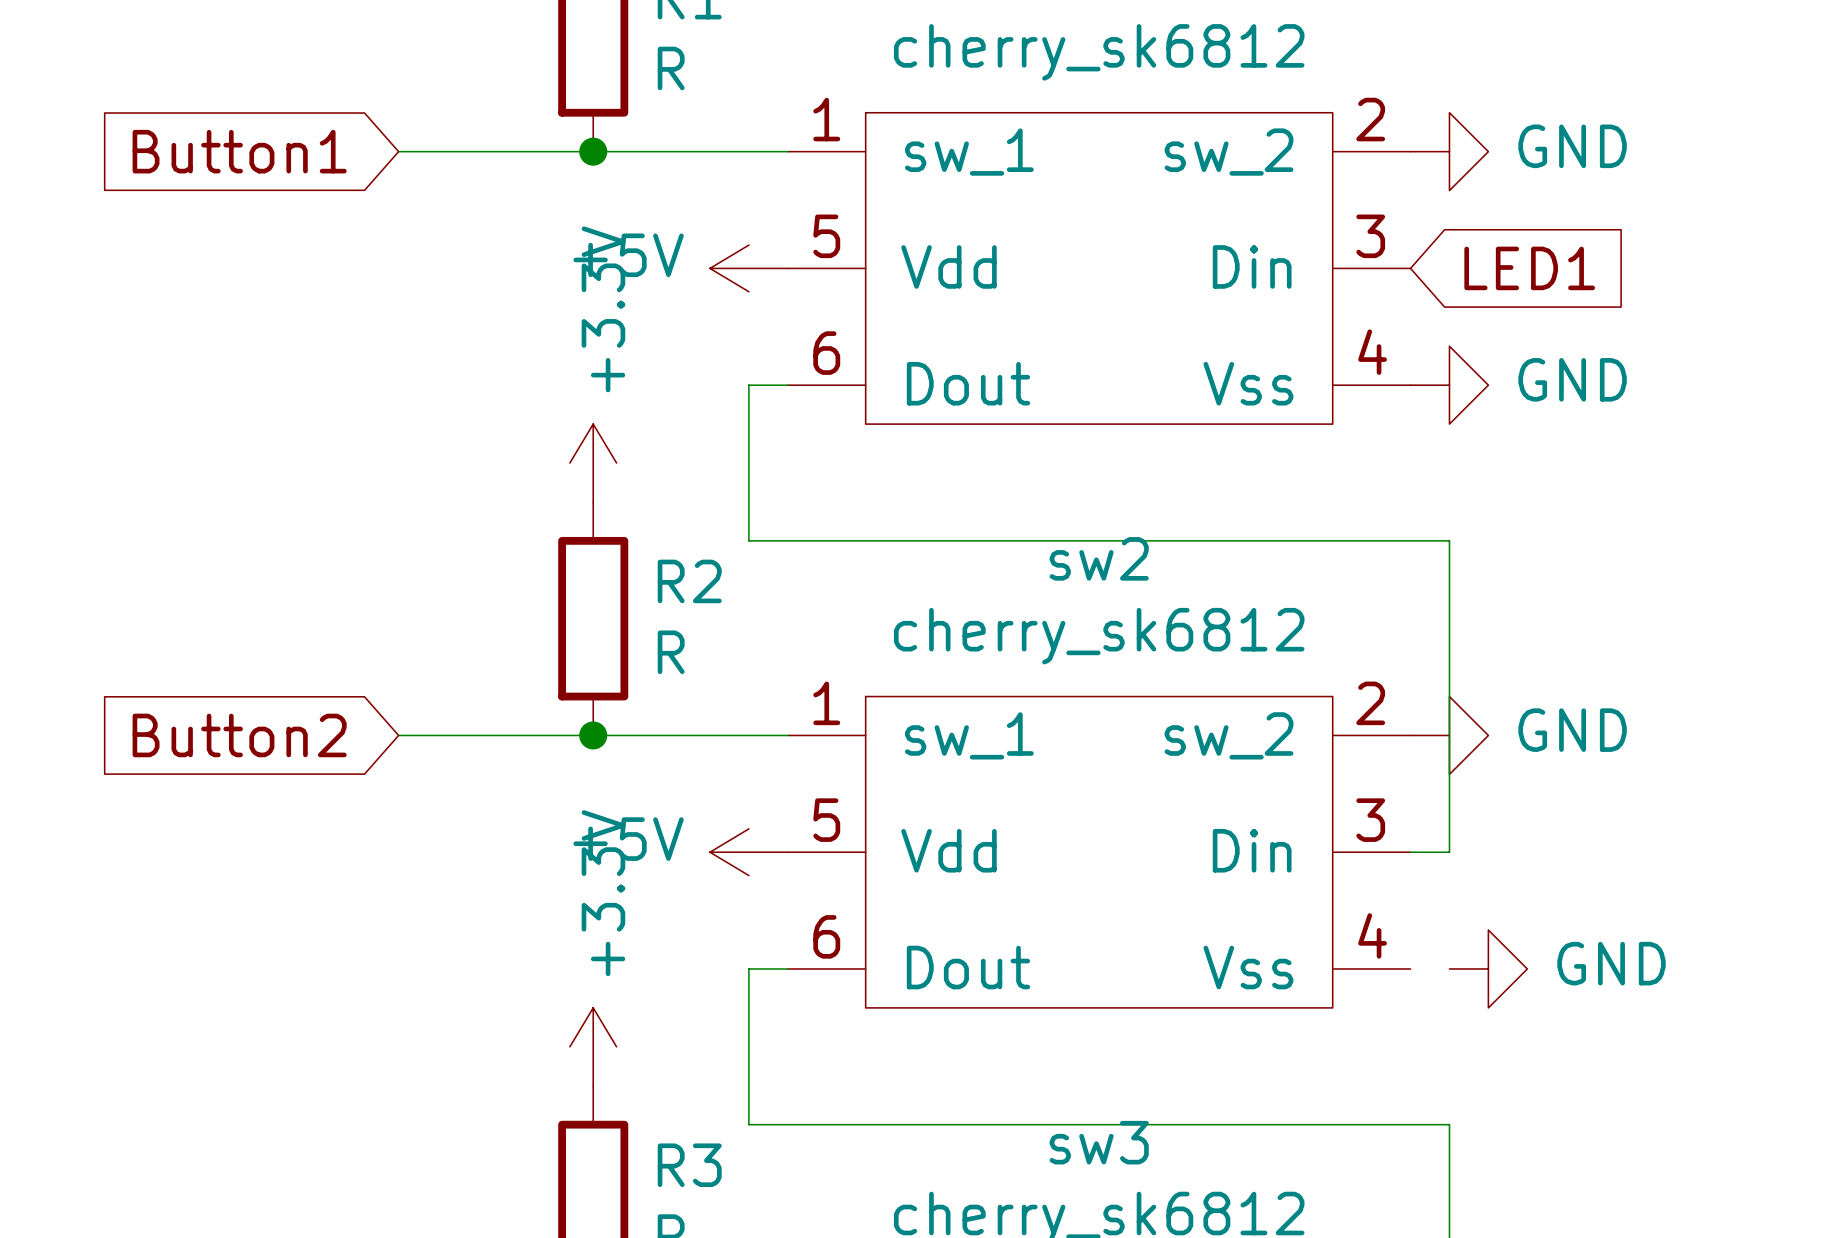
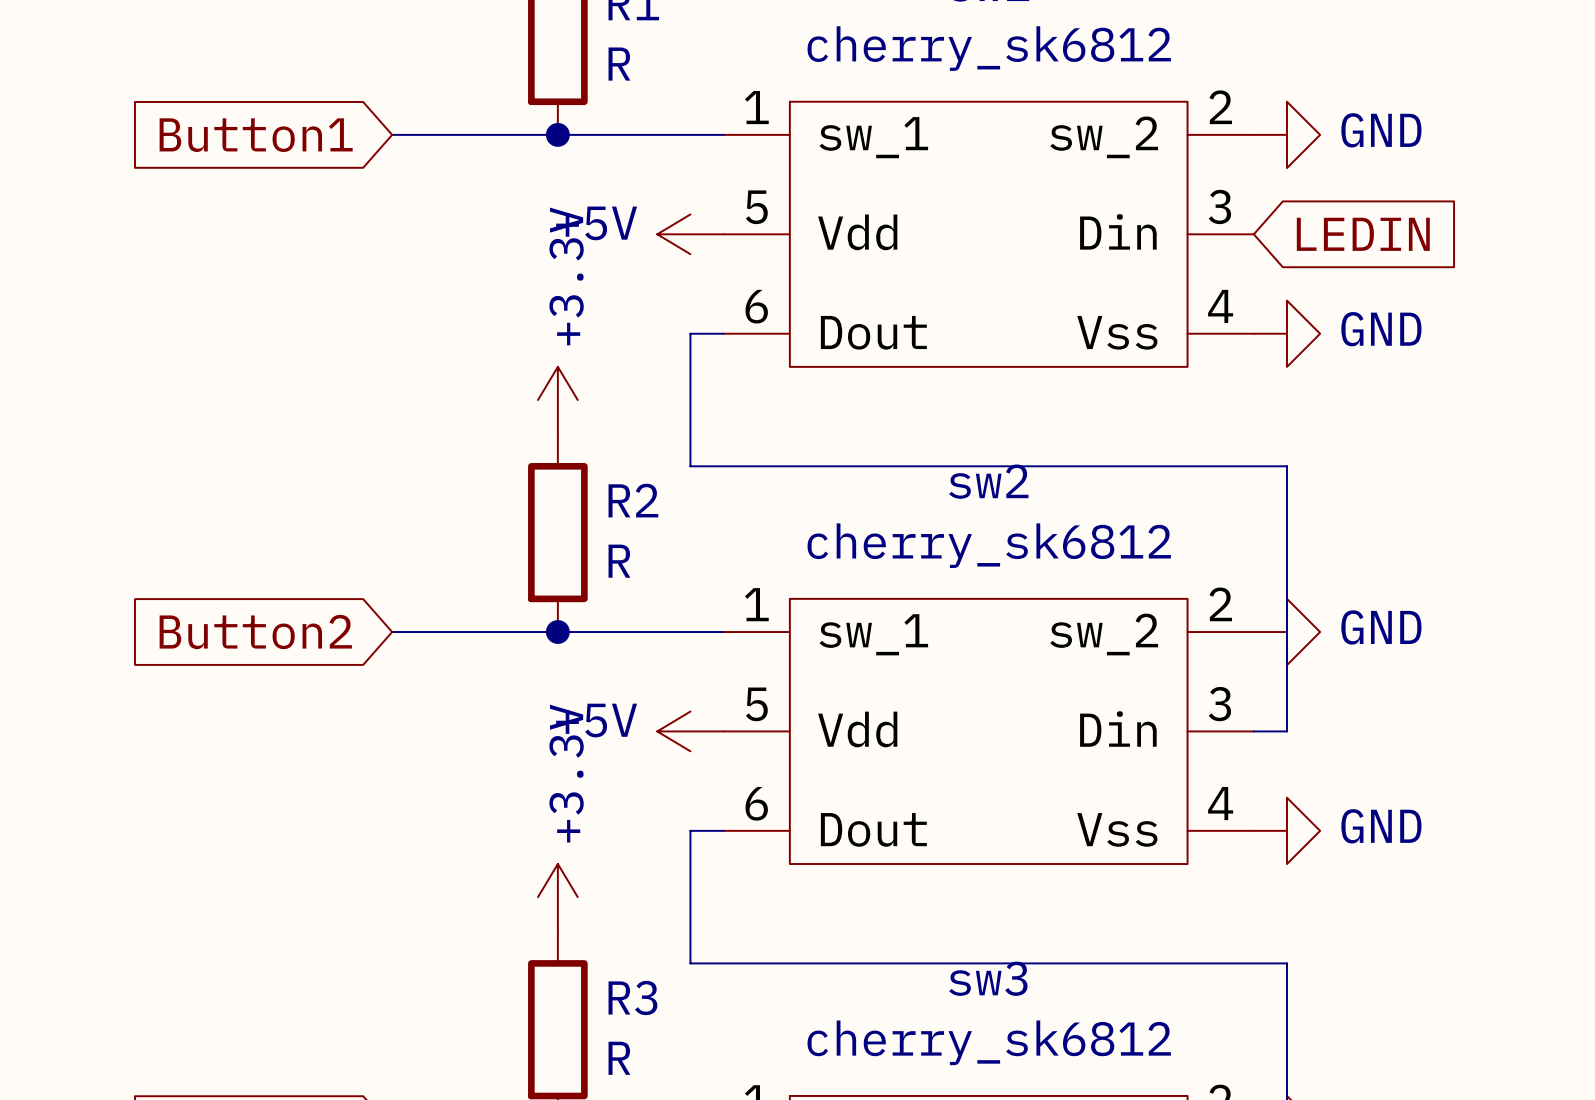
global label: LED1 (1529, 268) -> LEDIN (1363, 234)
power symbol position: GND (1488, 968) -> GND (1286, 830)

